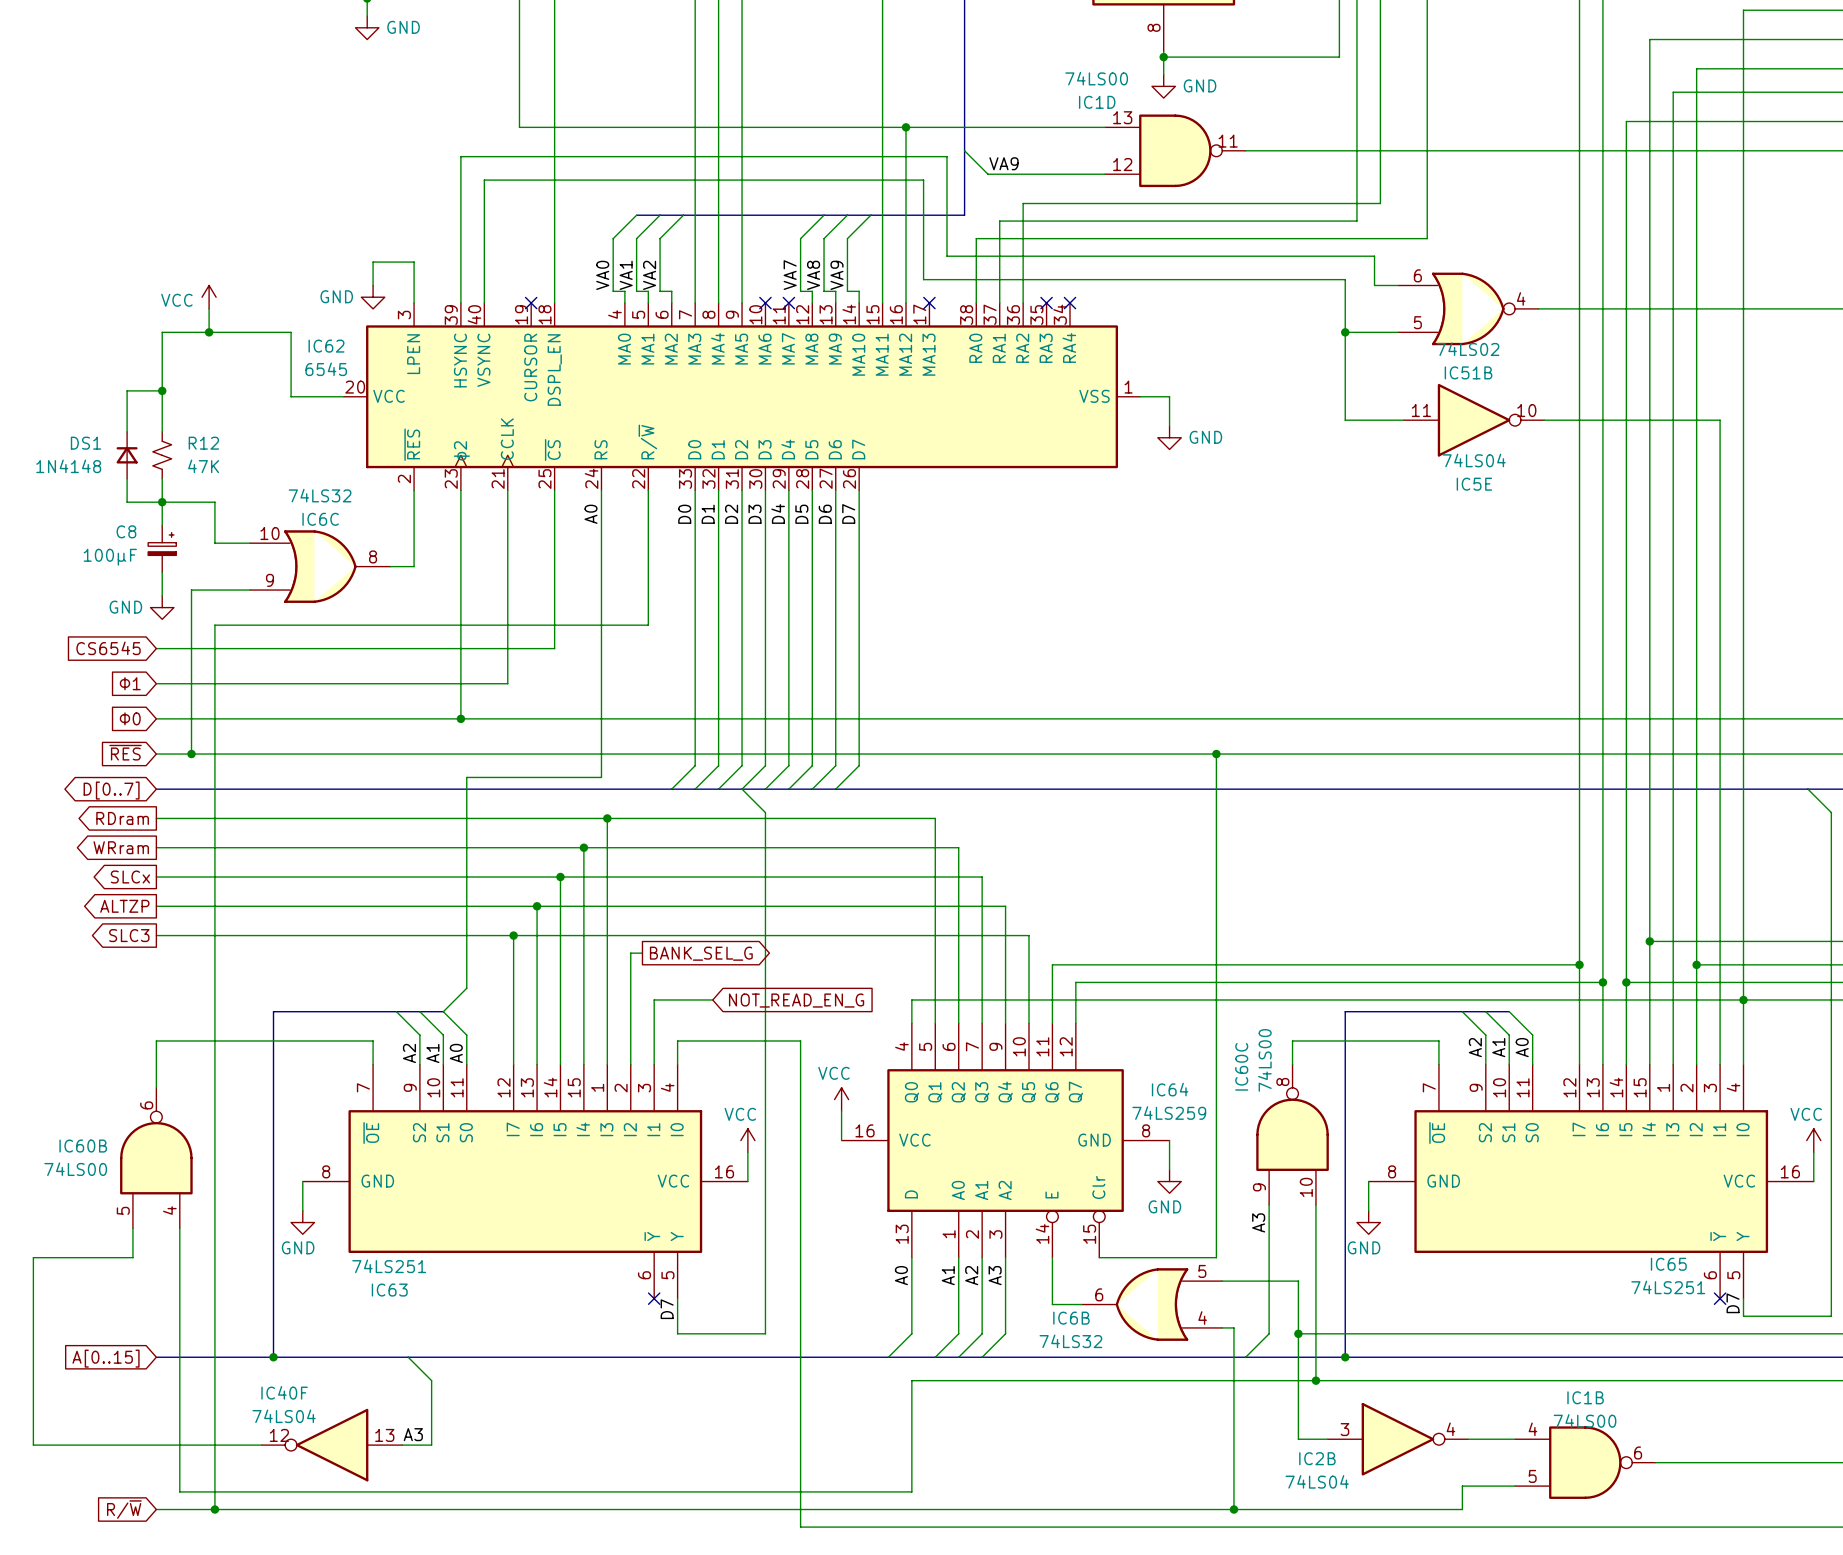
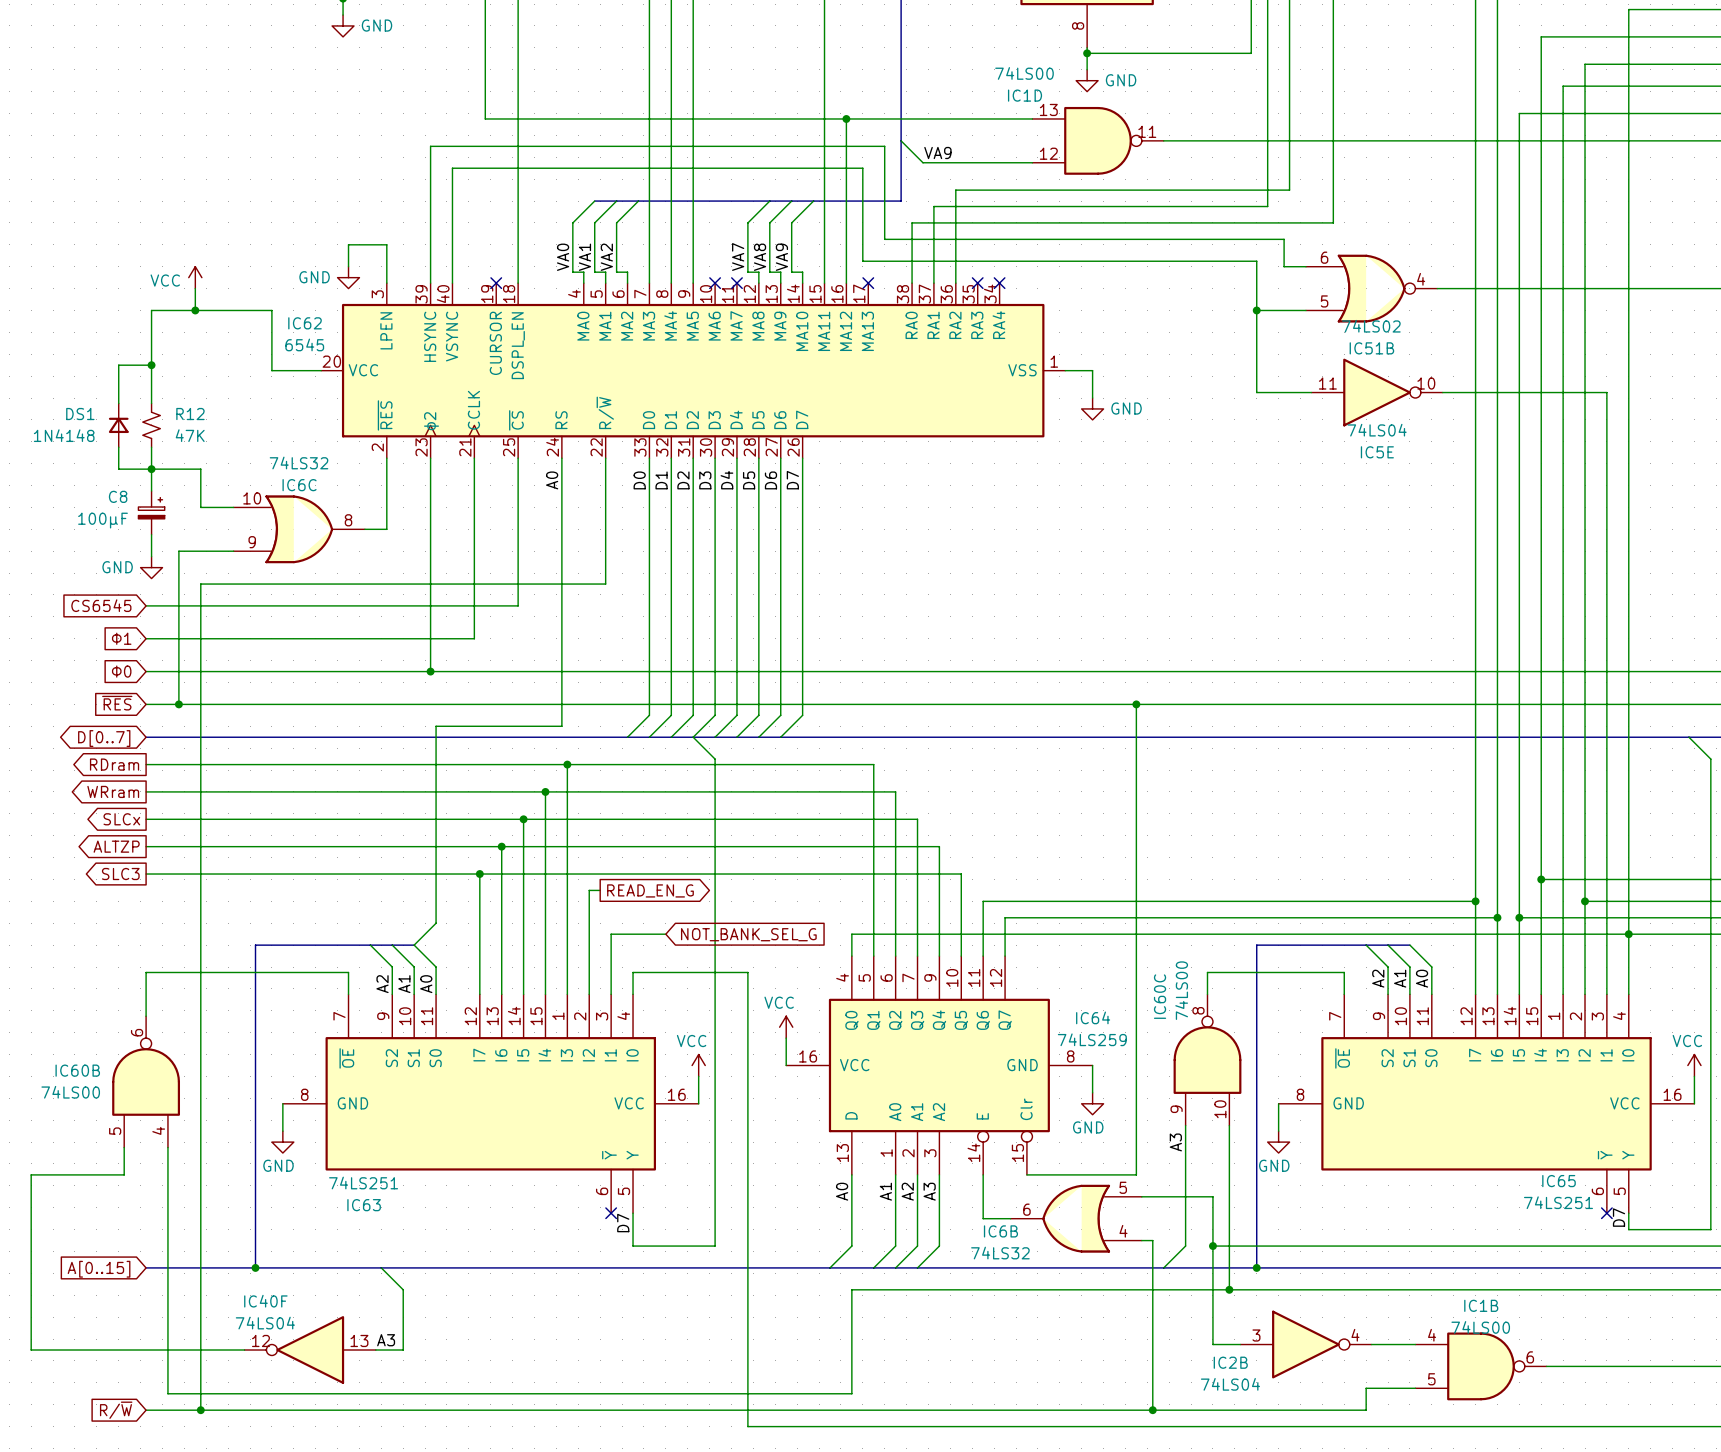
global label: BANK_SEL_G (701, 953) -> READ_EN_G (650, 890)
global label: NOT_READ_EN_G (796, 1000) -> NOT_BANK_SEL_G (748, 934)

